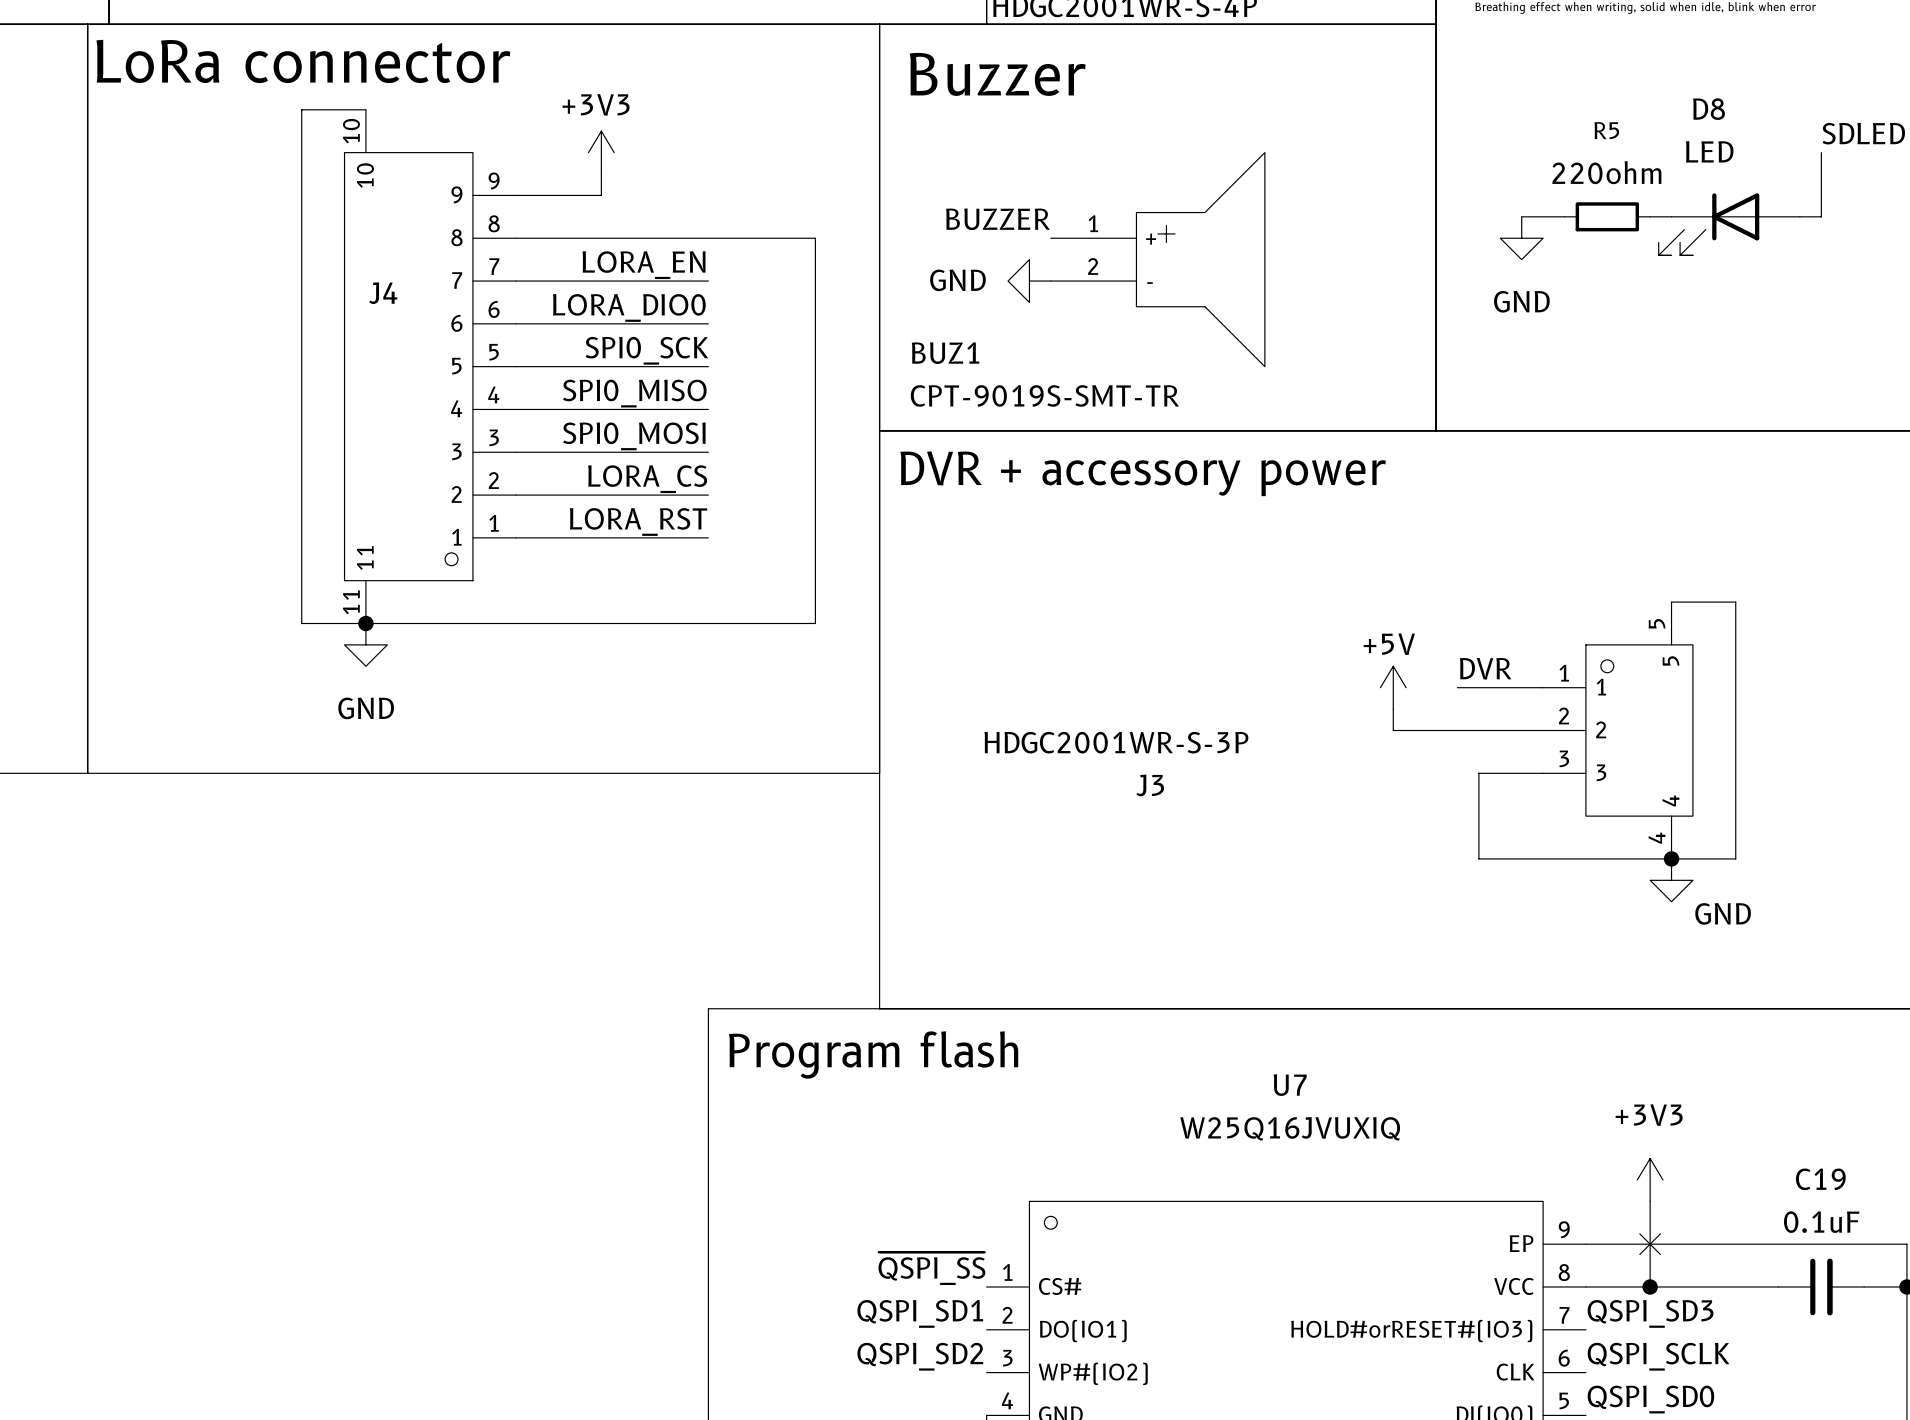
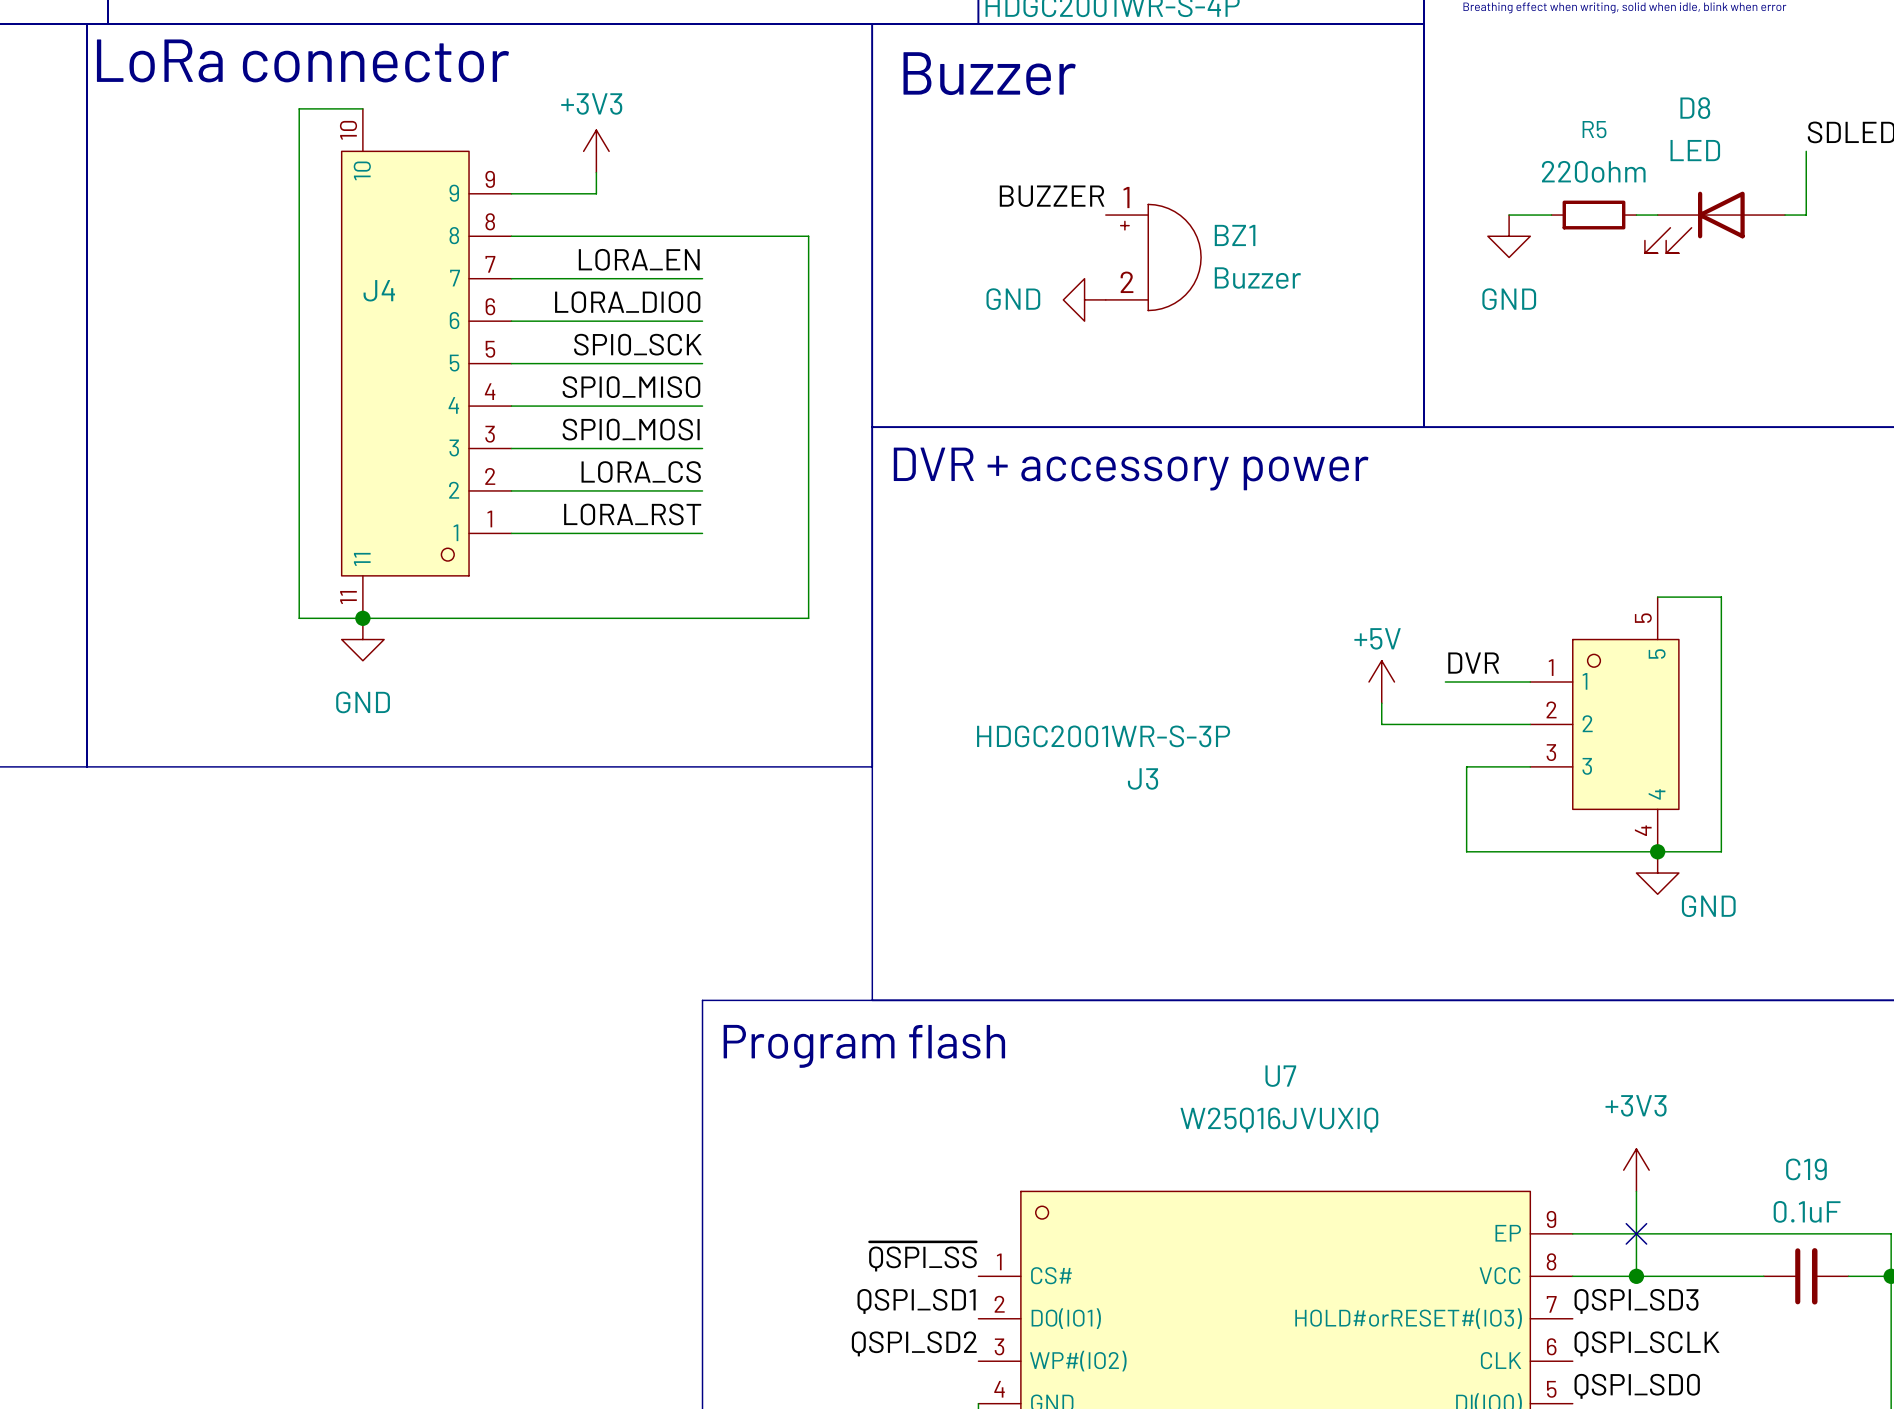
label position: BUZZER (997, 219) -> BUZZER (1052, 196)
BUZ1: CPT-9019S-SMT-TR (1157, 259) -> none
BZ1: none -> Buzzer (1153, 257)
power symbol position: GND (1029, 281) -> GND (1084, 299)

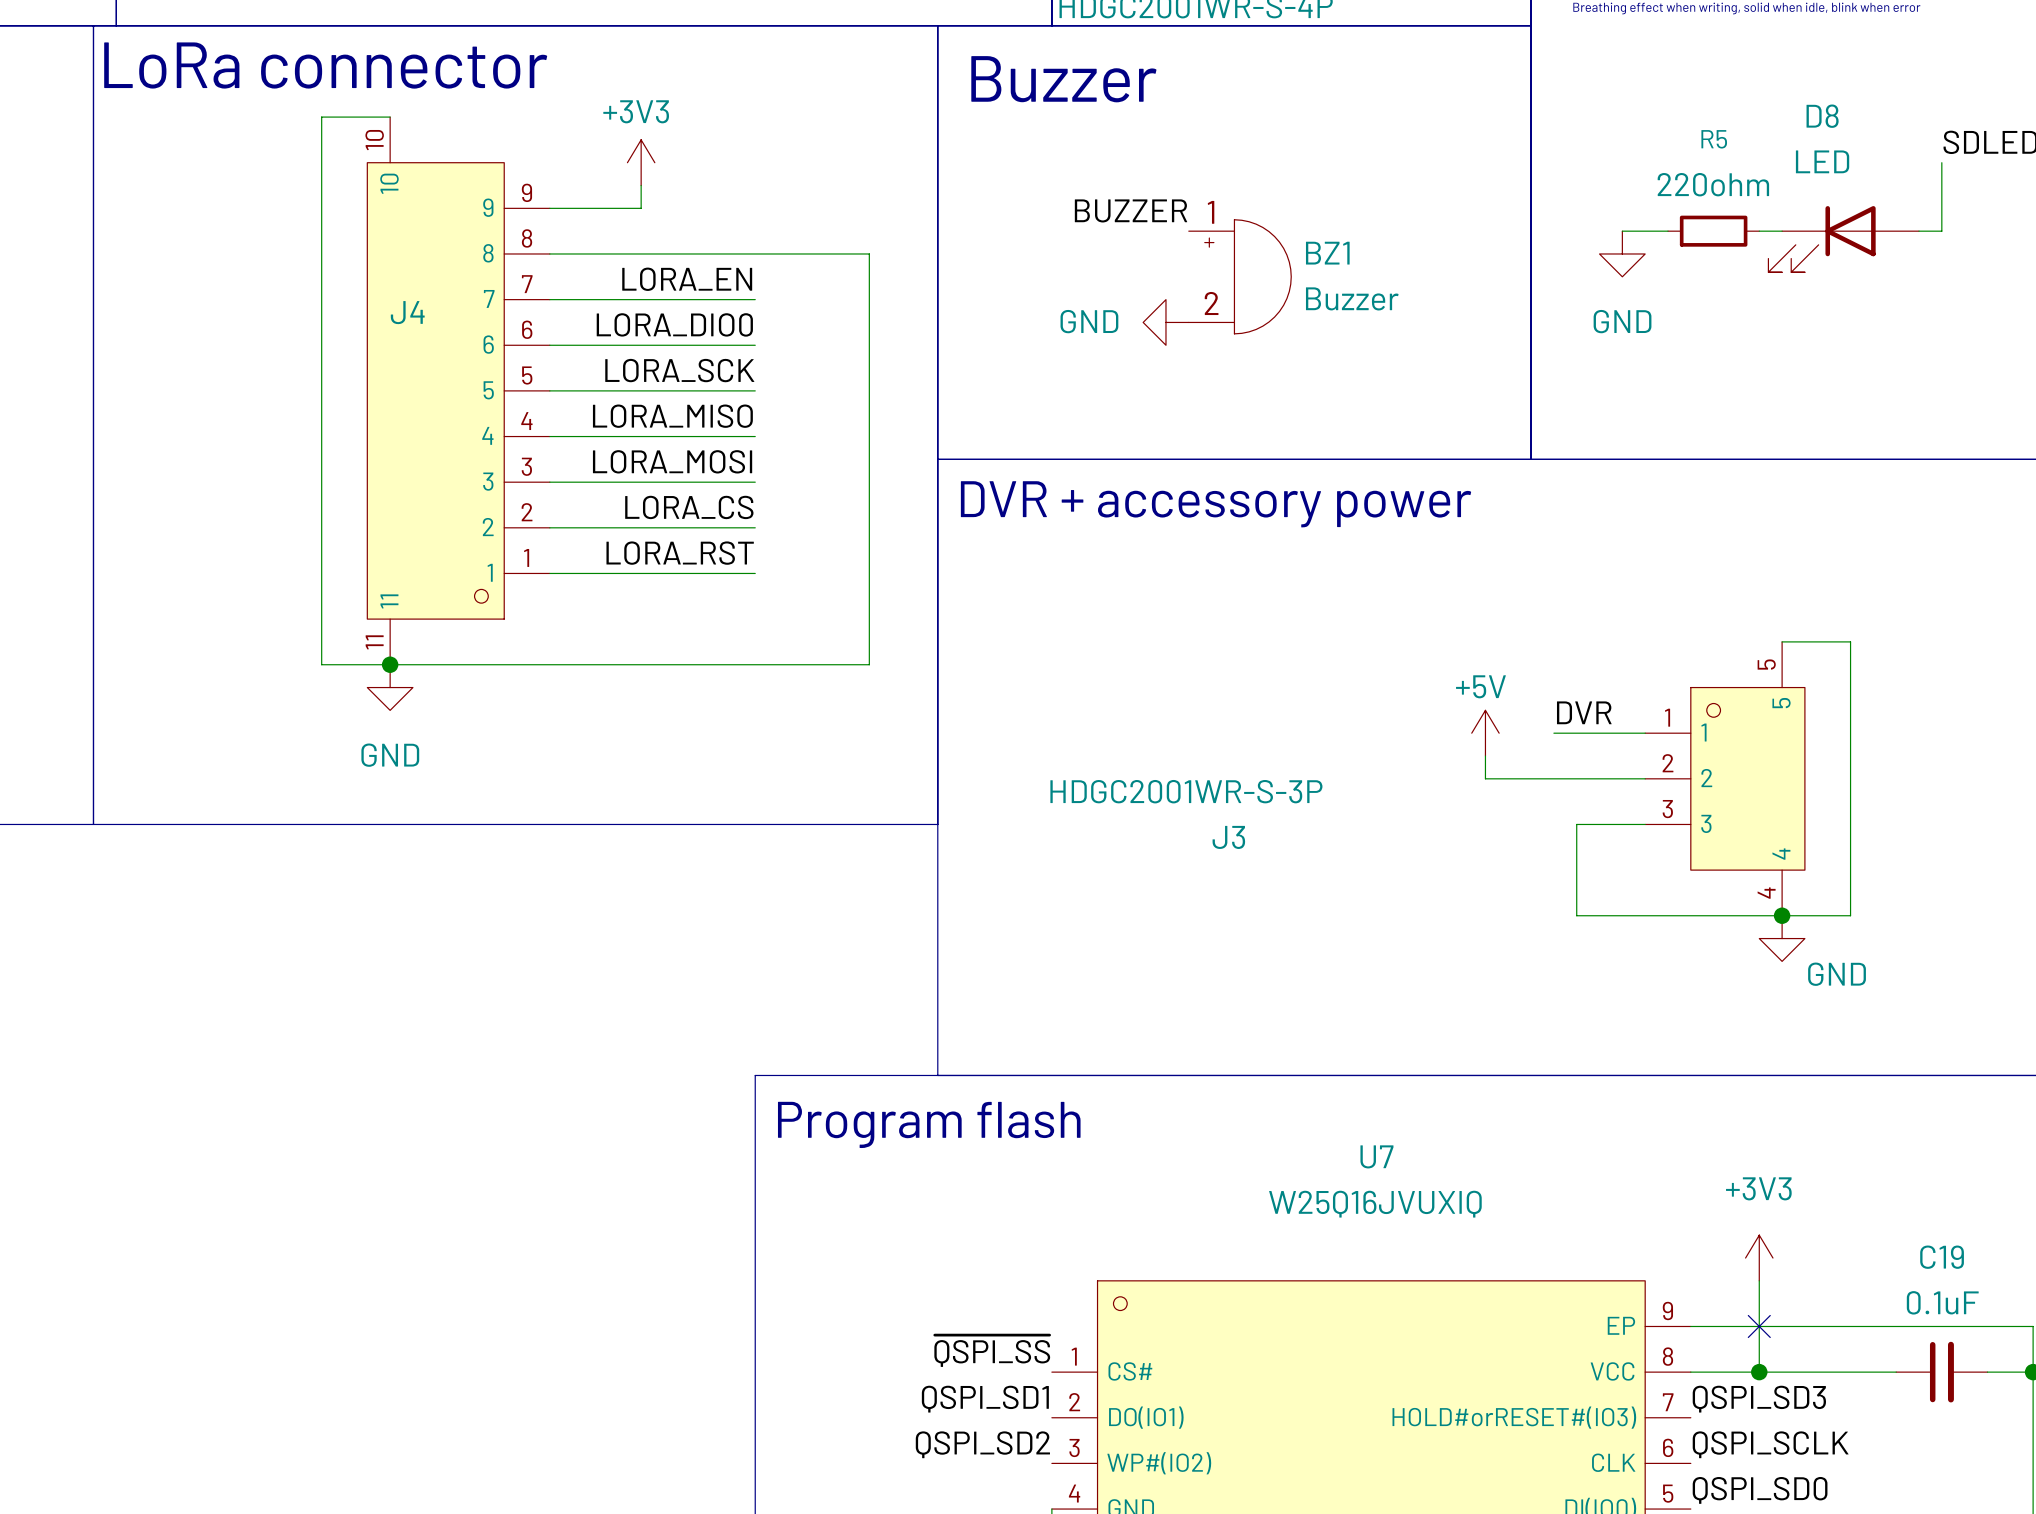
label: SPI0_SCK (637, 344) -> LORA_SCK (679, 370)
label: SPI0_MISO (631, 387) -> LORA_MISO (672, 416)
label: SPI0_MOSI (631, 429) -> LORA_MOSI (672, 461)

